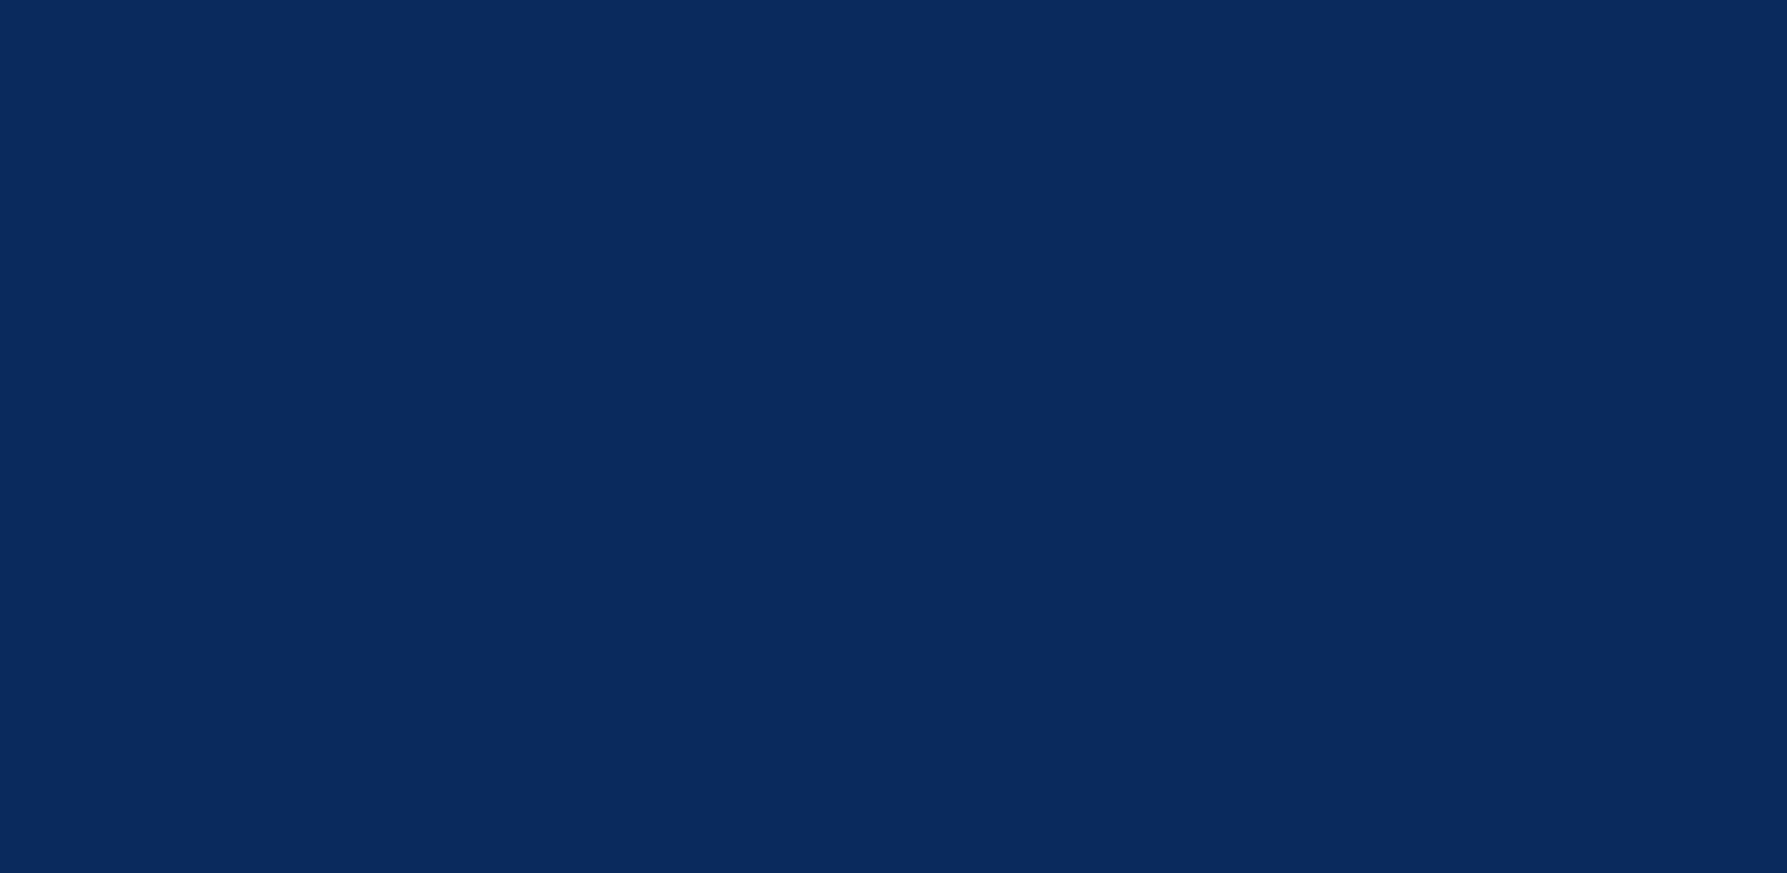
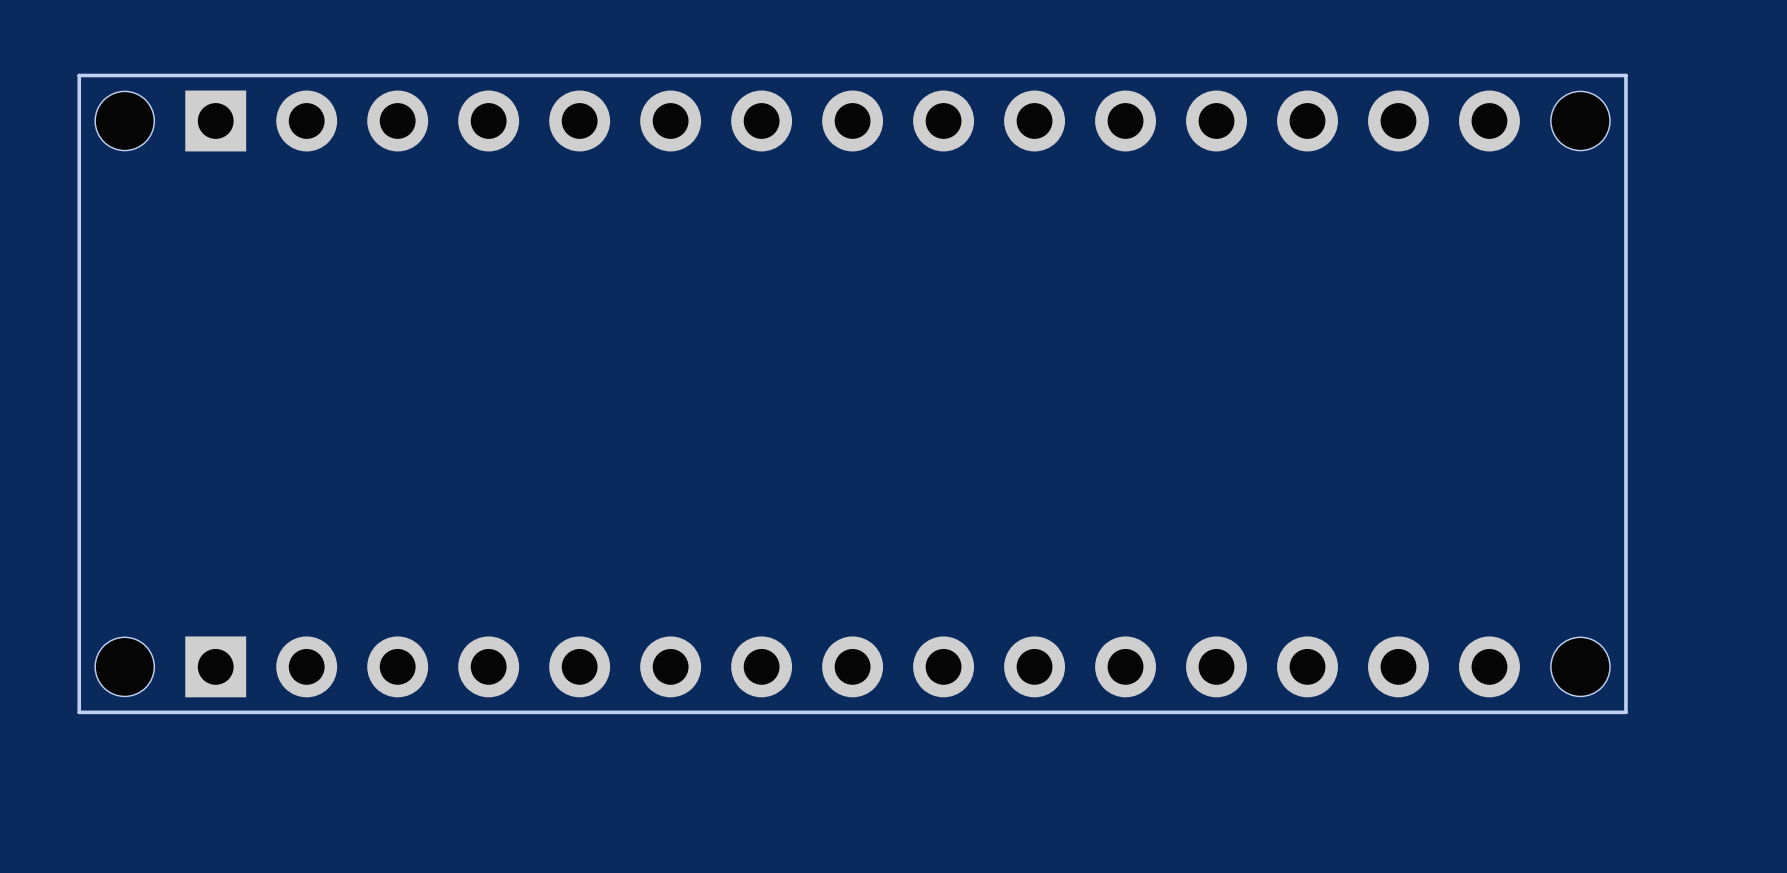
board edge: none -> (79, 75) (1625, 75) (1625, 712) (79, 712) (79, 75)
part: none -> (124, 120)
part: none -> (852, 120)
part: none -> (1580, 120)
part: none -> (124, 666)
part: none -> (852, 666)
part: none -> (1580, 666)

